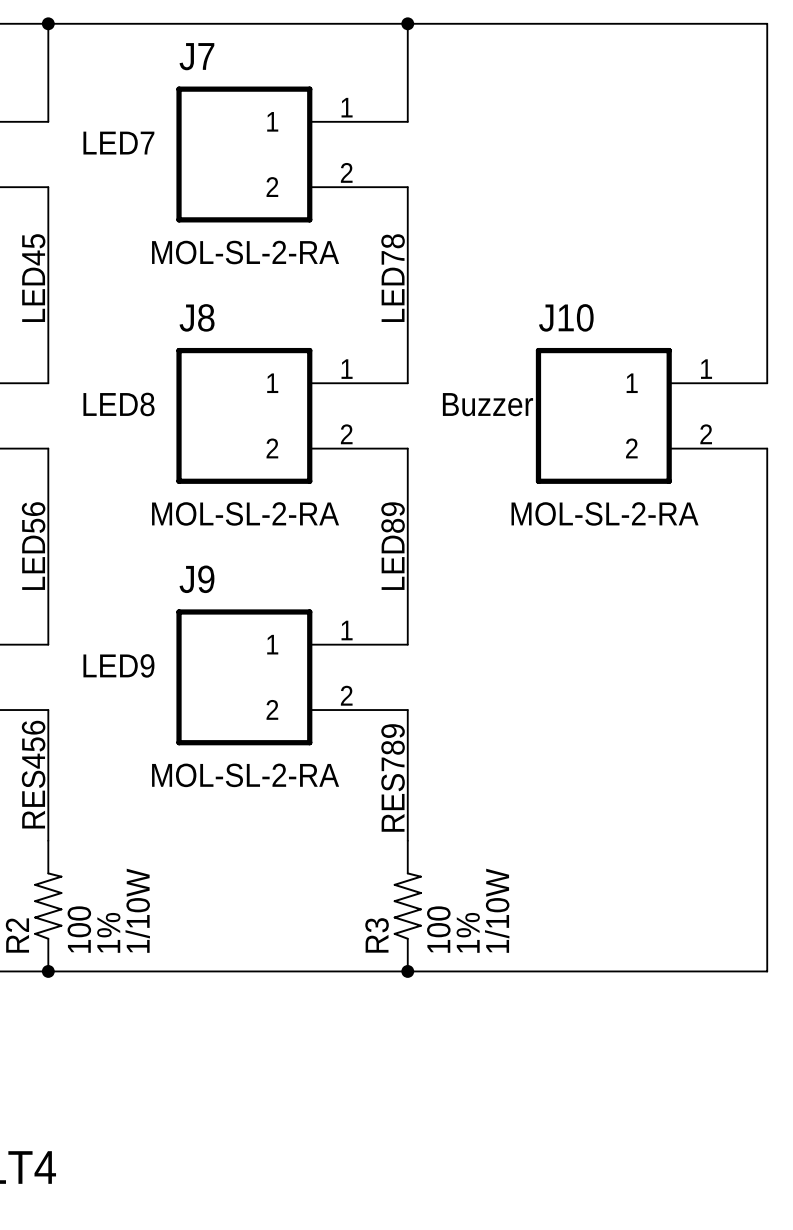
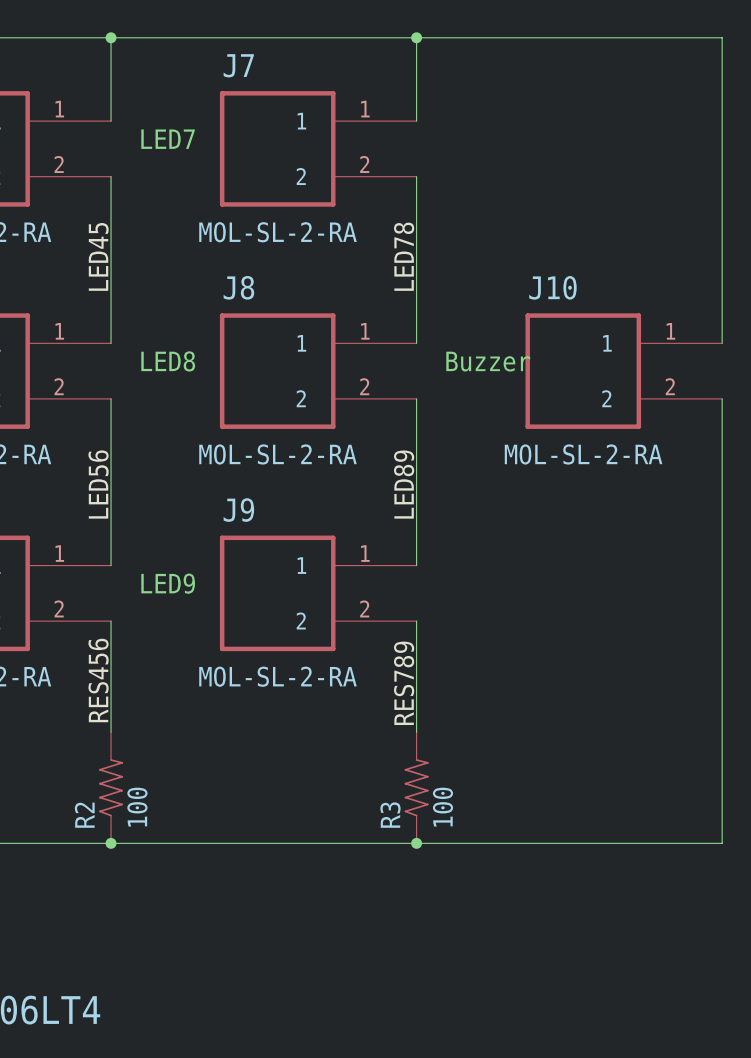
R2 text: 1/10W (137, 910) -> none
R3 text: 1/10W (497, 910) -> none
R2 text: 1% (108, 932) -> none
R3 text: 1% (468, 932) -> none

